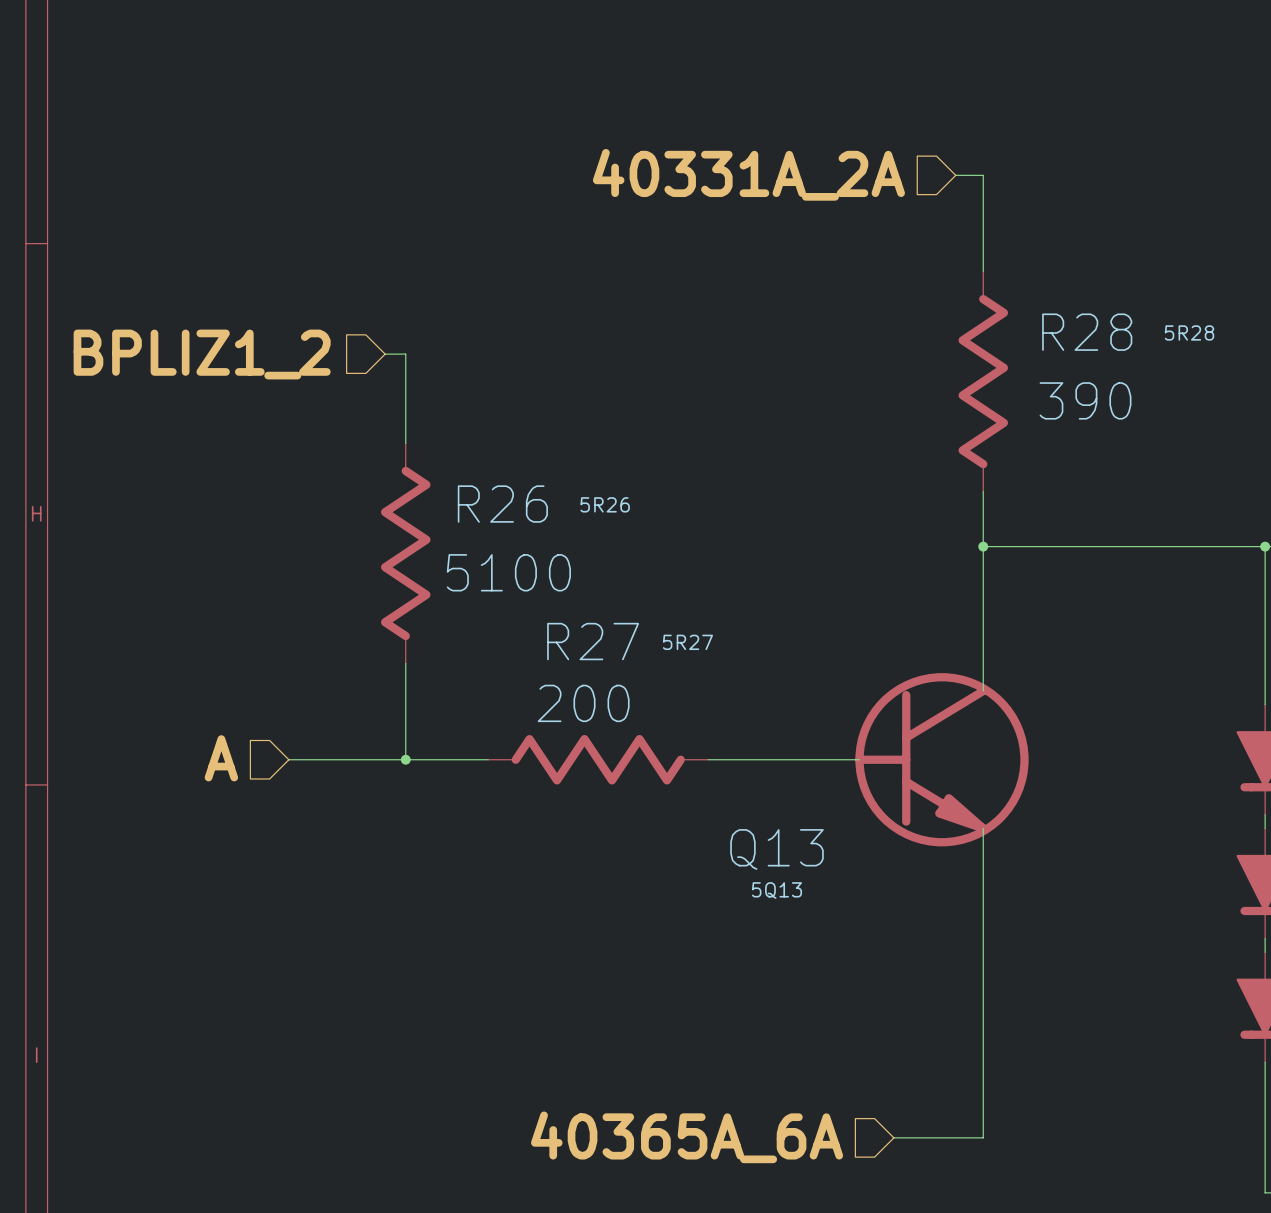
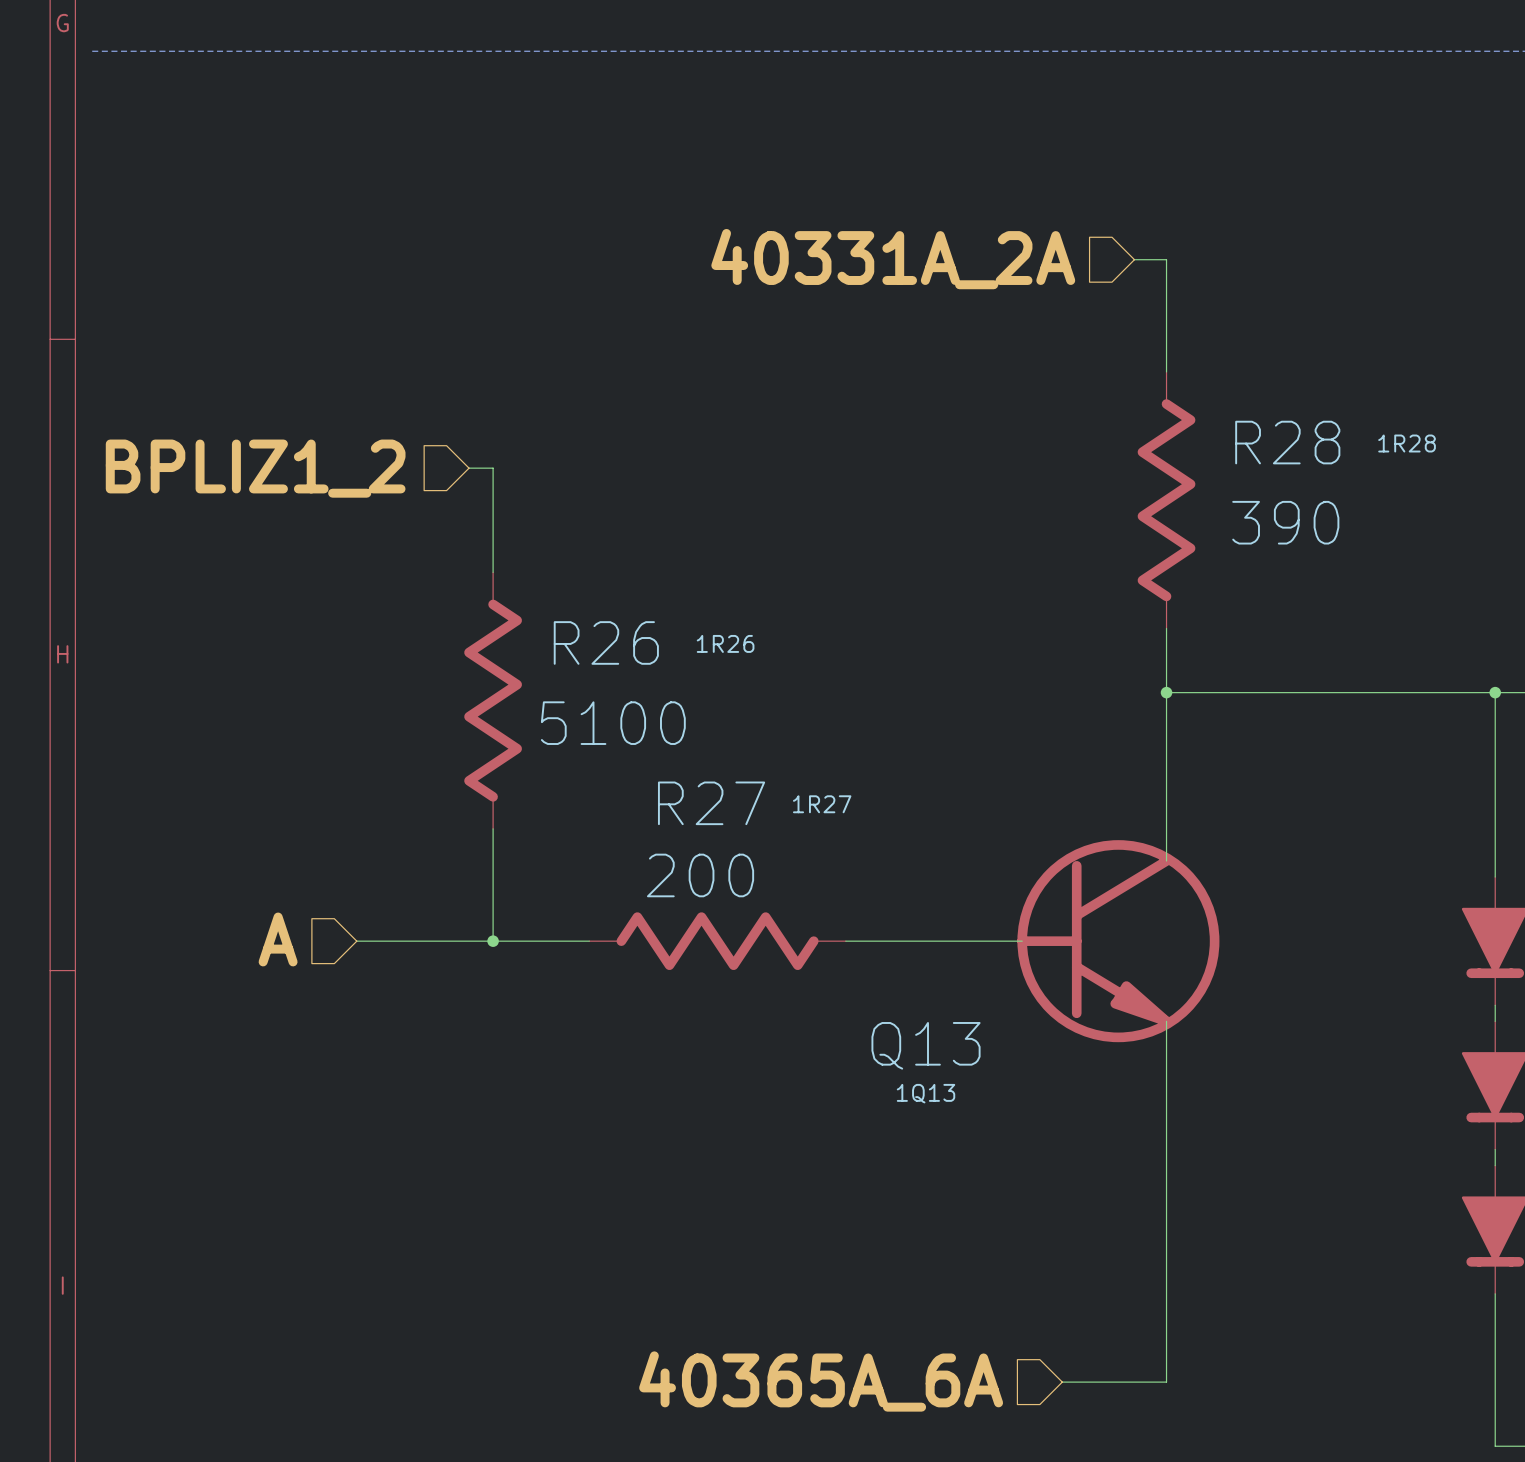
5R28 name: 5R28 (1189, 332) -> 1R28 (1407, 443)
5R26 name: 5R26 (605, 504) -> 1R26 (725, 643)
5R27 name: 5R27 (687, 642) -> 1R27 (822, 804)
5Q13 name: 5Q13 (777, 890) -> 1Q13 (926, 1093)

